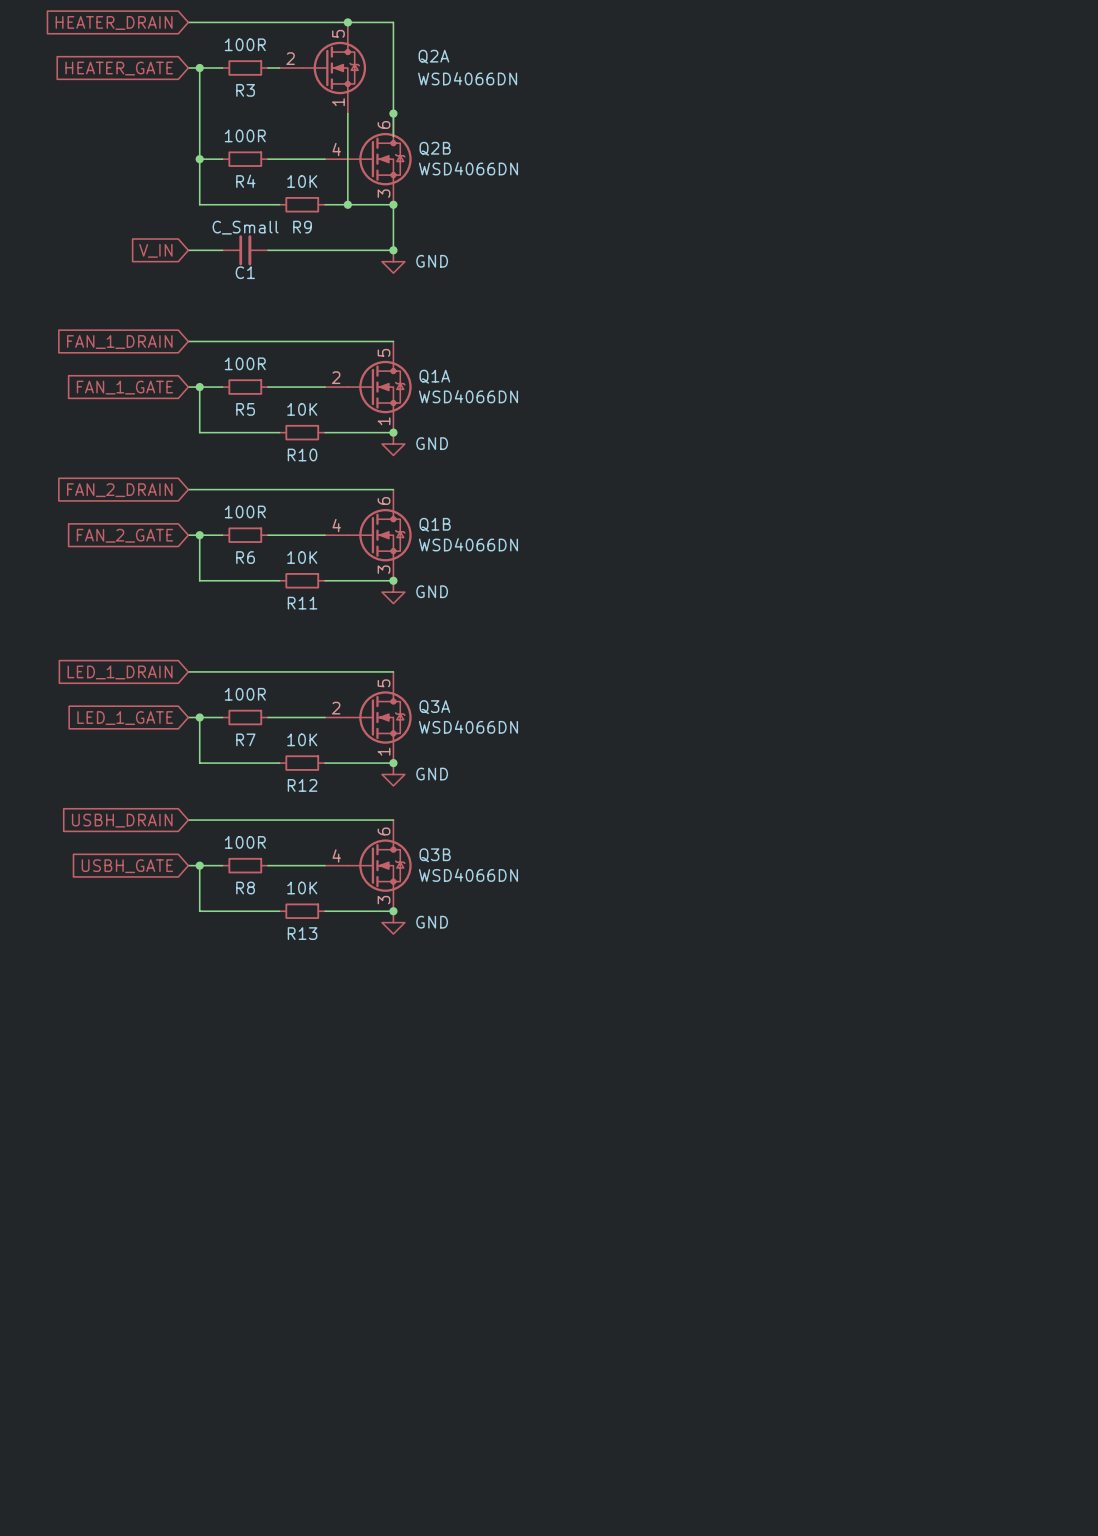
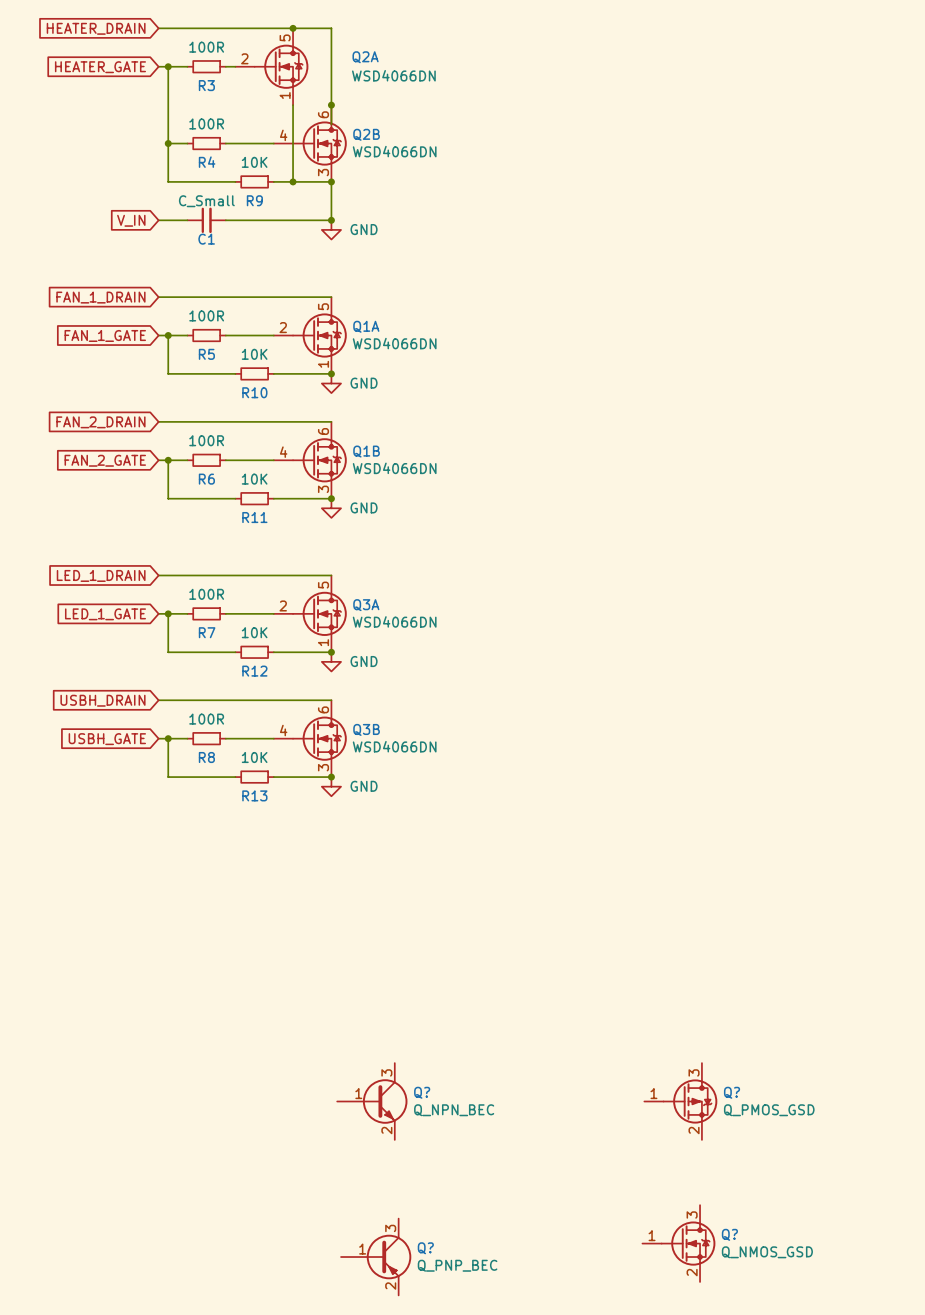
Q?: none -> Q_NPN_BEC (372, 1101)
Q?: none -> Q_PMOS_GSD (680, 1101)
Q?: none -> Q_NMOS_GSD (678, 1243)
Q?: none -> Q_PNP_BEC (376, 1257)

